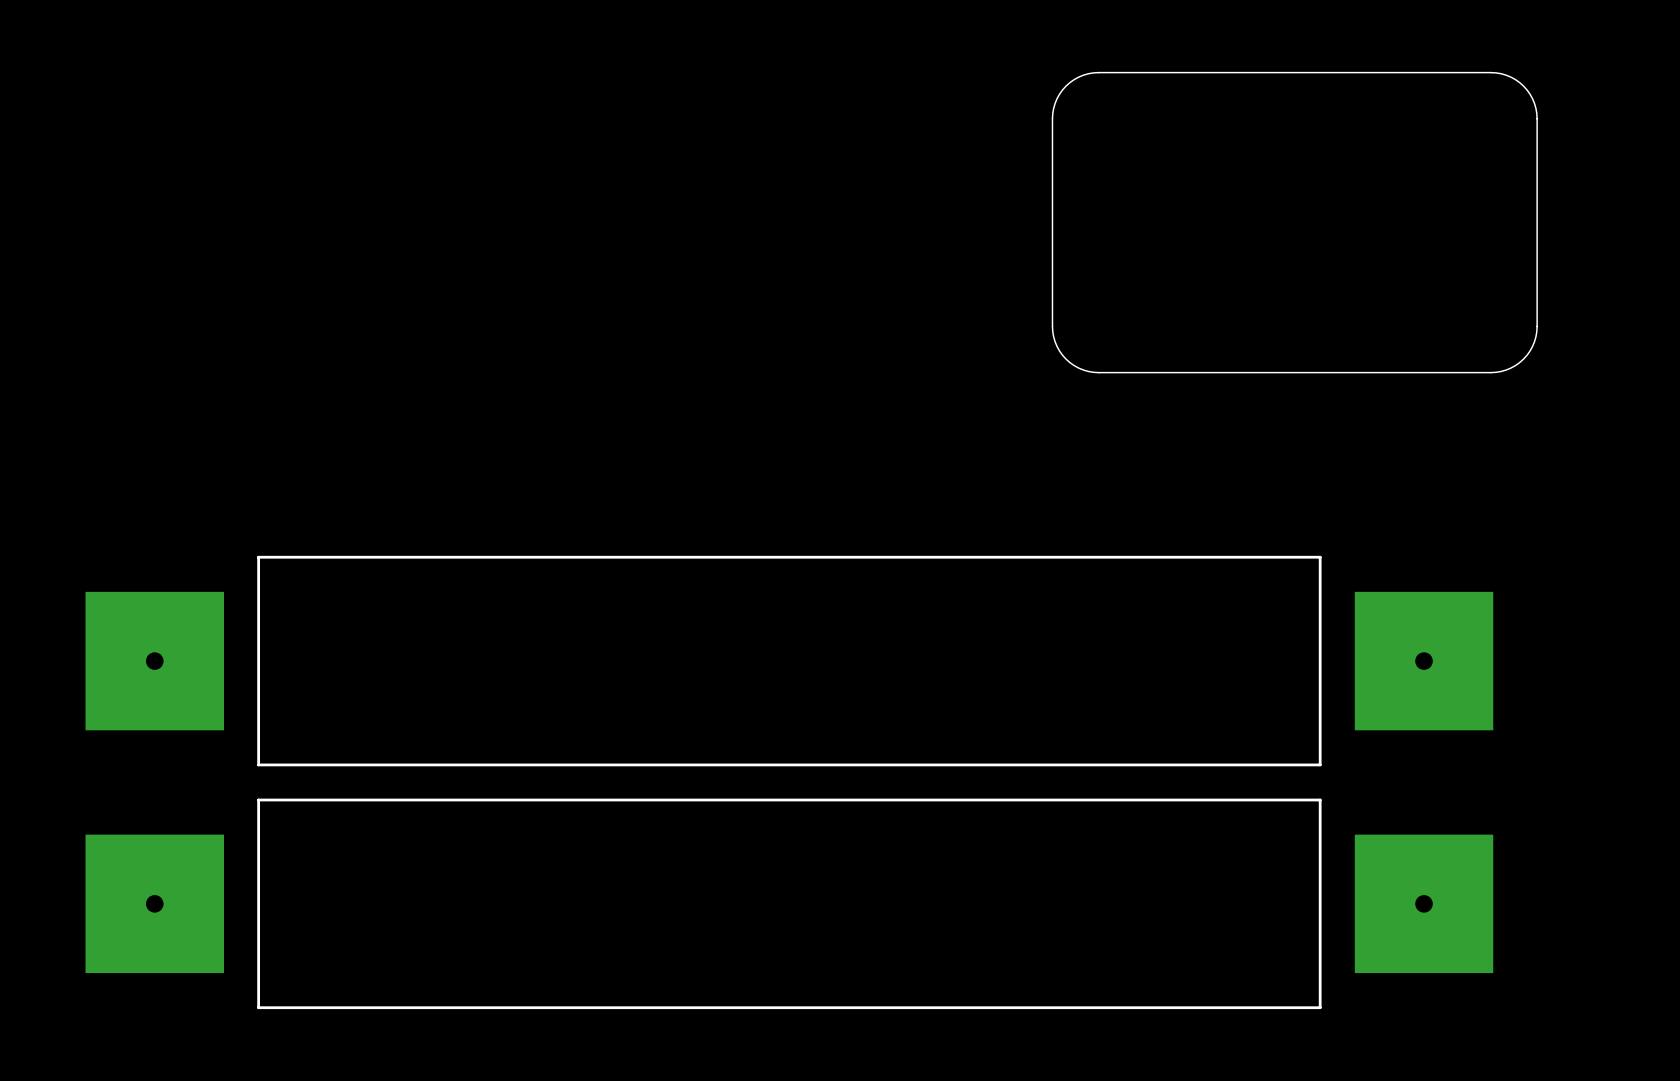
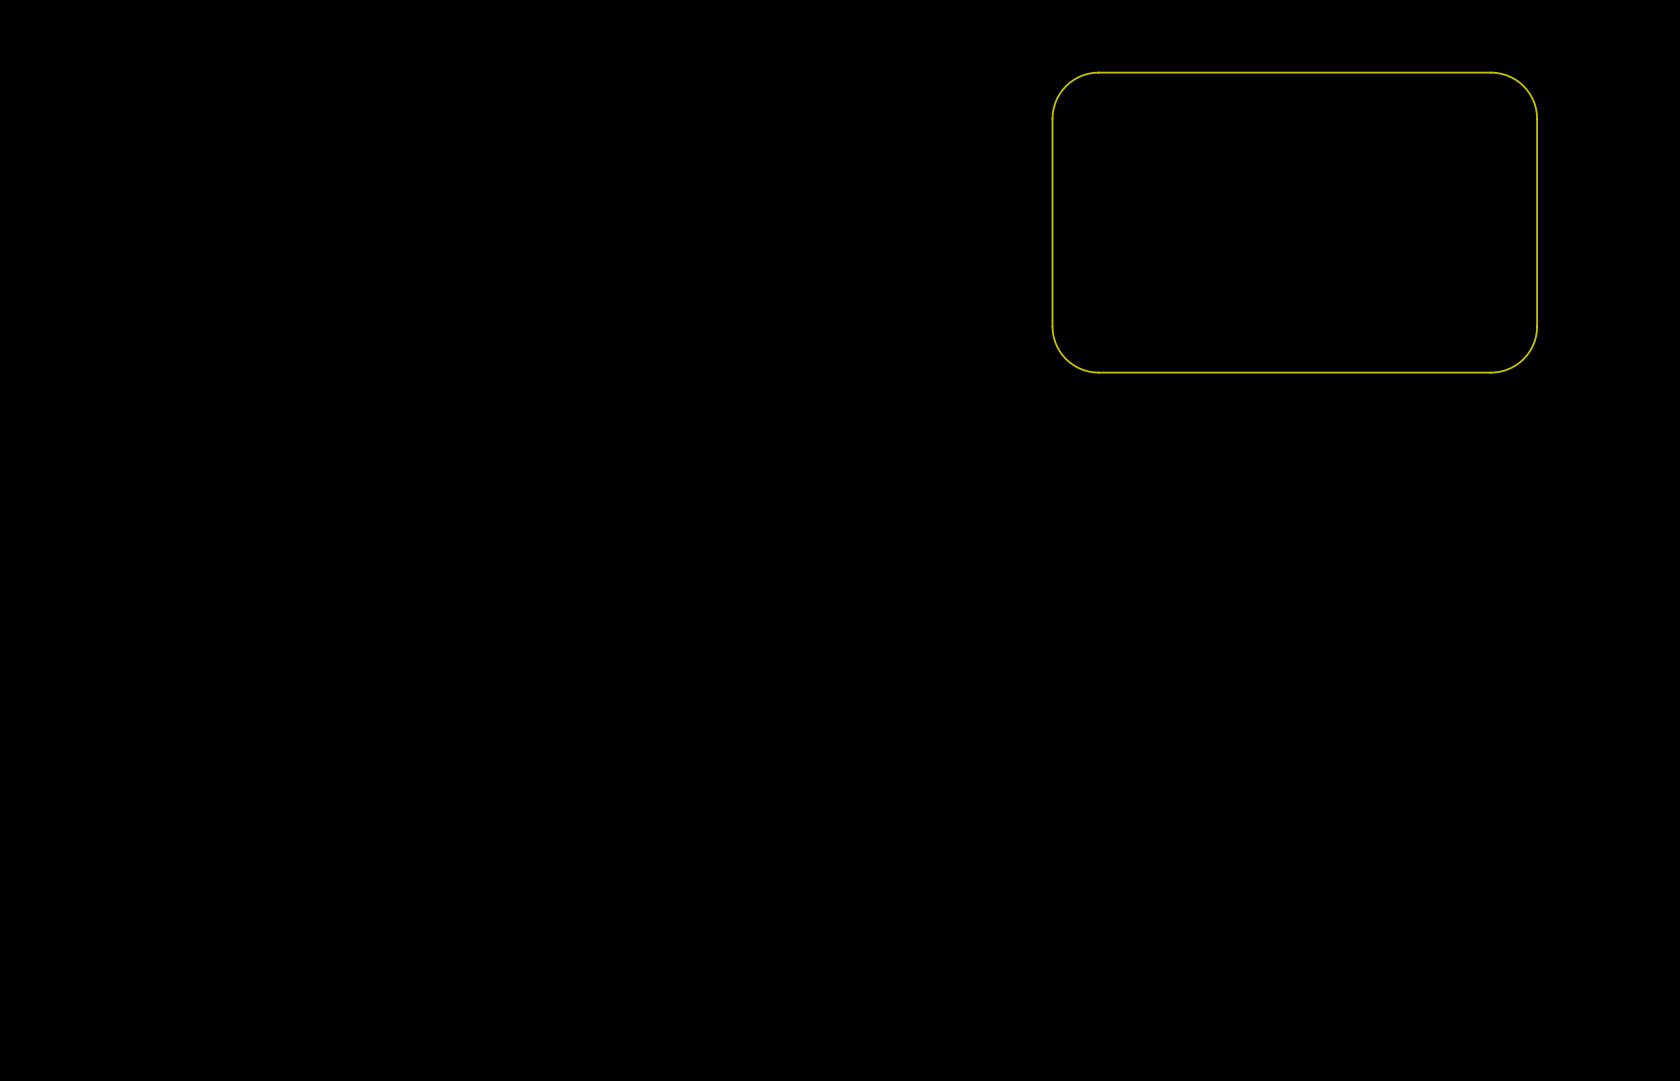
part: (789, 661) -> none
part: (789, 903) -> none

